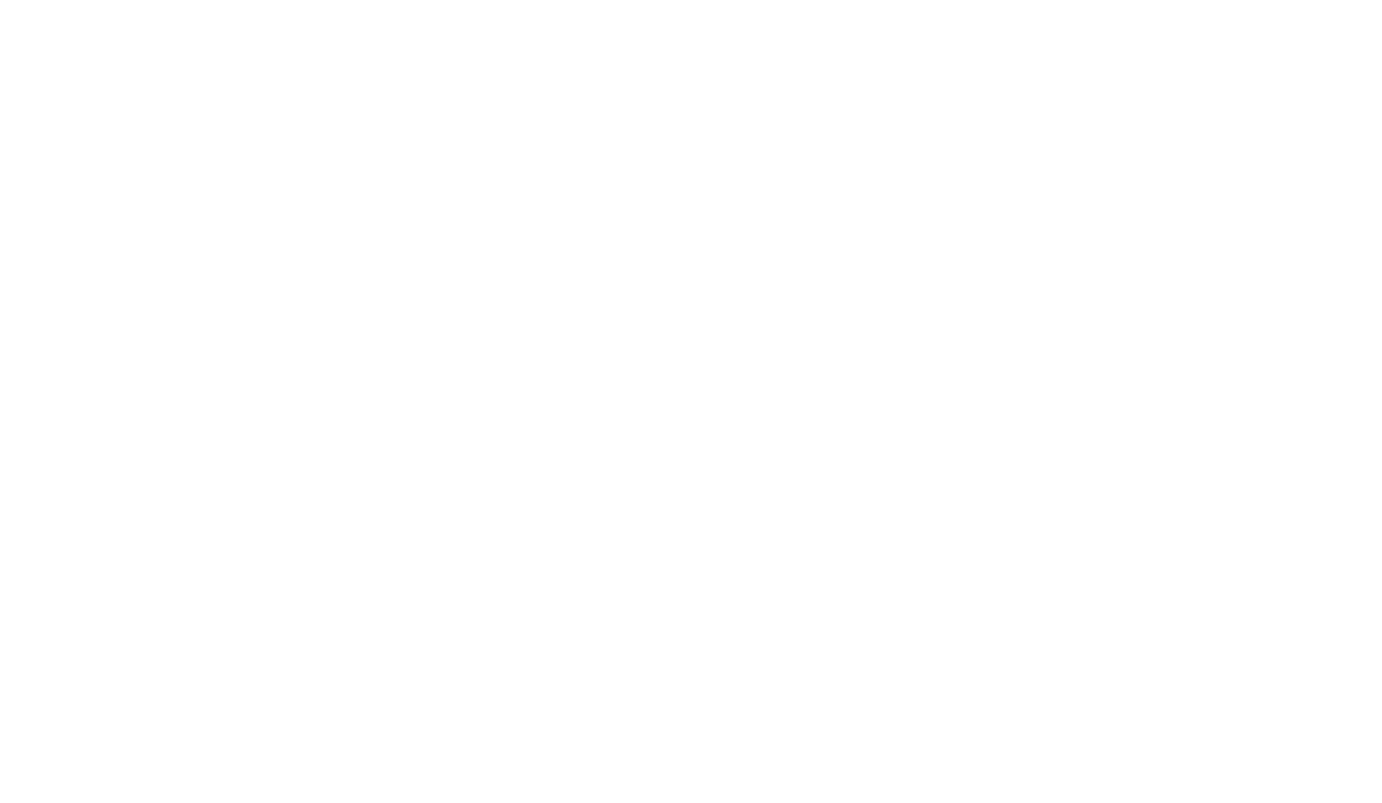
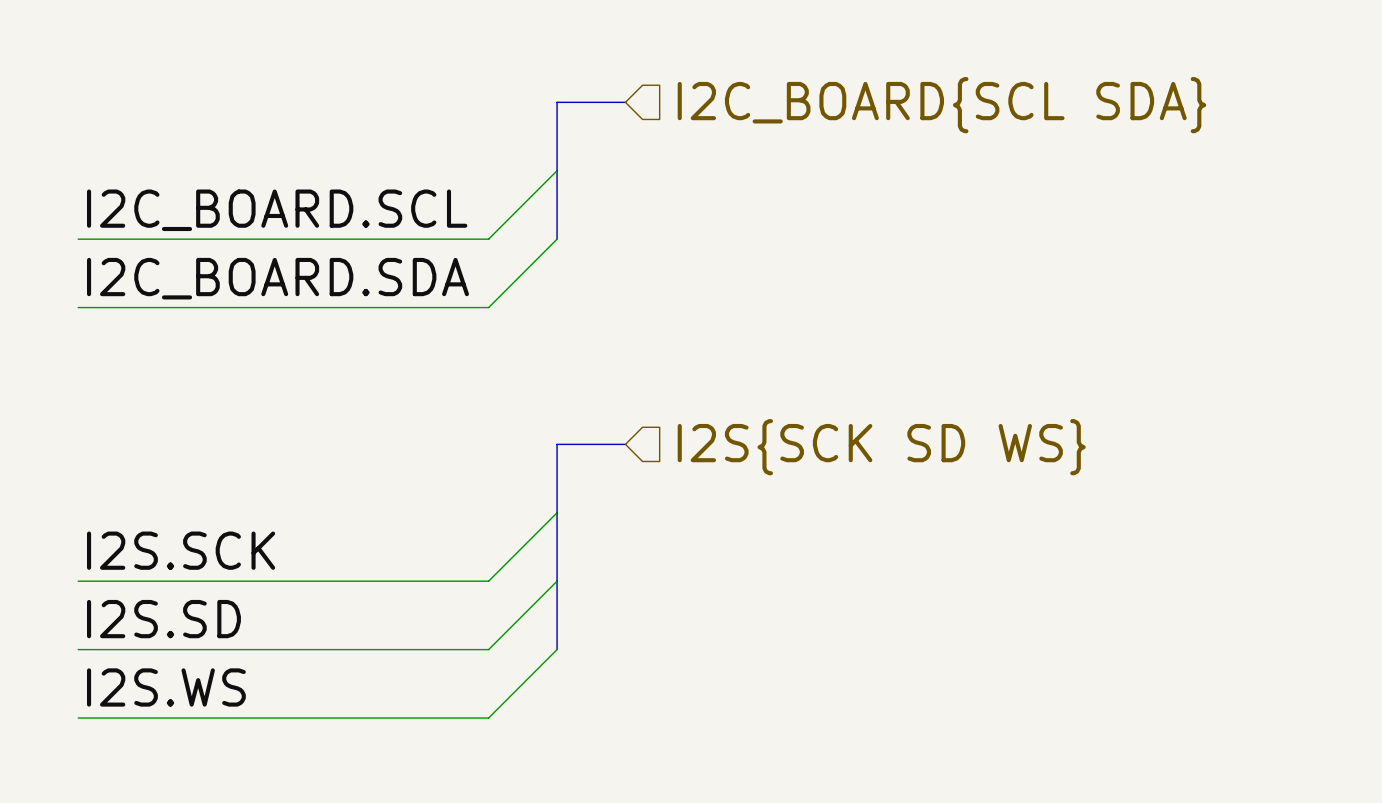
bus: none -> (625, 102) (557, 102) (557, 239)
hierarchical label: none -> I2C_BOARD{SCL SDA} (941, 105)
wire: none -> (557, 170) (488, 239) (78, 239)
label: none -> I2C_BOARD.SCL (277, 210)
wire: none -> (557, 239) (488, 307) (78, 307)
label: none -> I2C_BOARD.SDA (277, 278)
bus: none -> (625, 444) (557, 444) (557, 649)
hierarchical label: none -> I2S{SCK SD WS} (881, 447)
wire: none -> (557, 512) (488, 581) (78, 581)
label: none -> I2S.SCK (181, 550)
wire: none -> (557, 581) (488, 649) (78, 649)
label: none -> I2S.SD (163, 619)
wire: none -> (557, 649) (488, 718) (78, 718)
label: none -> I2S.WS (166, 687)

